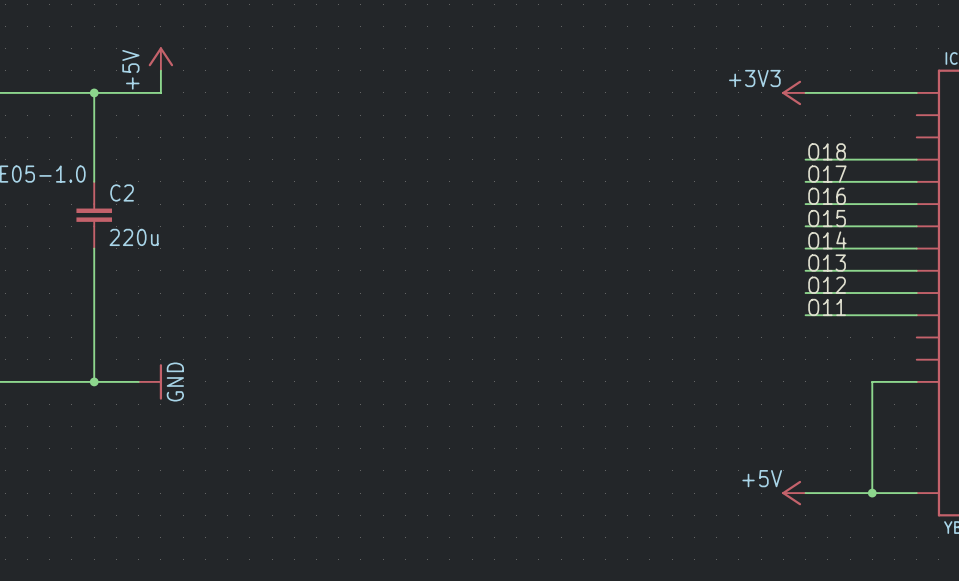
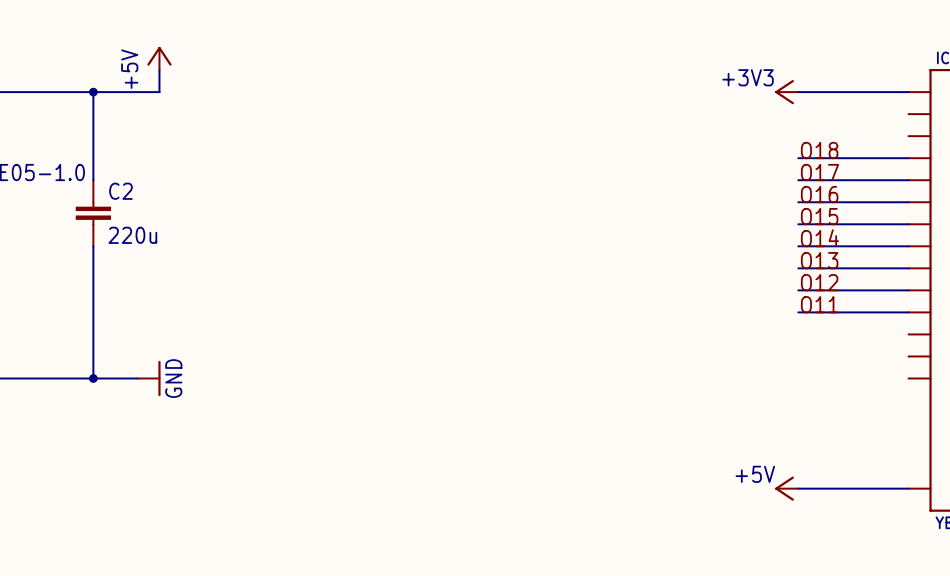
wire: (916, 381) (872, 381) (872, 493) -> none
junction: (872, 493) -> none

